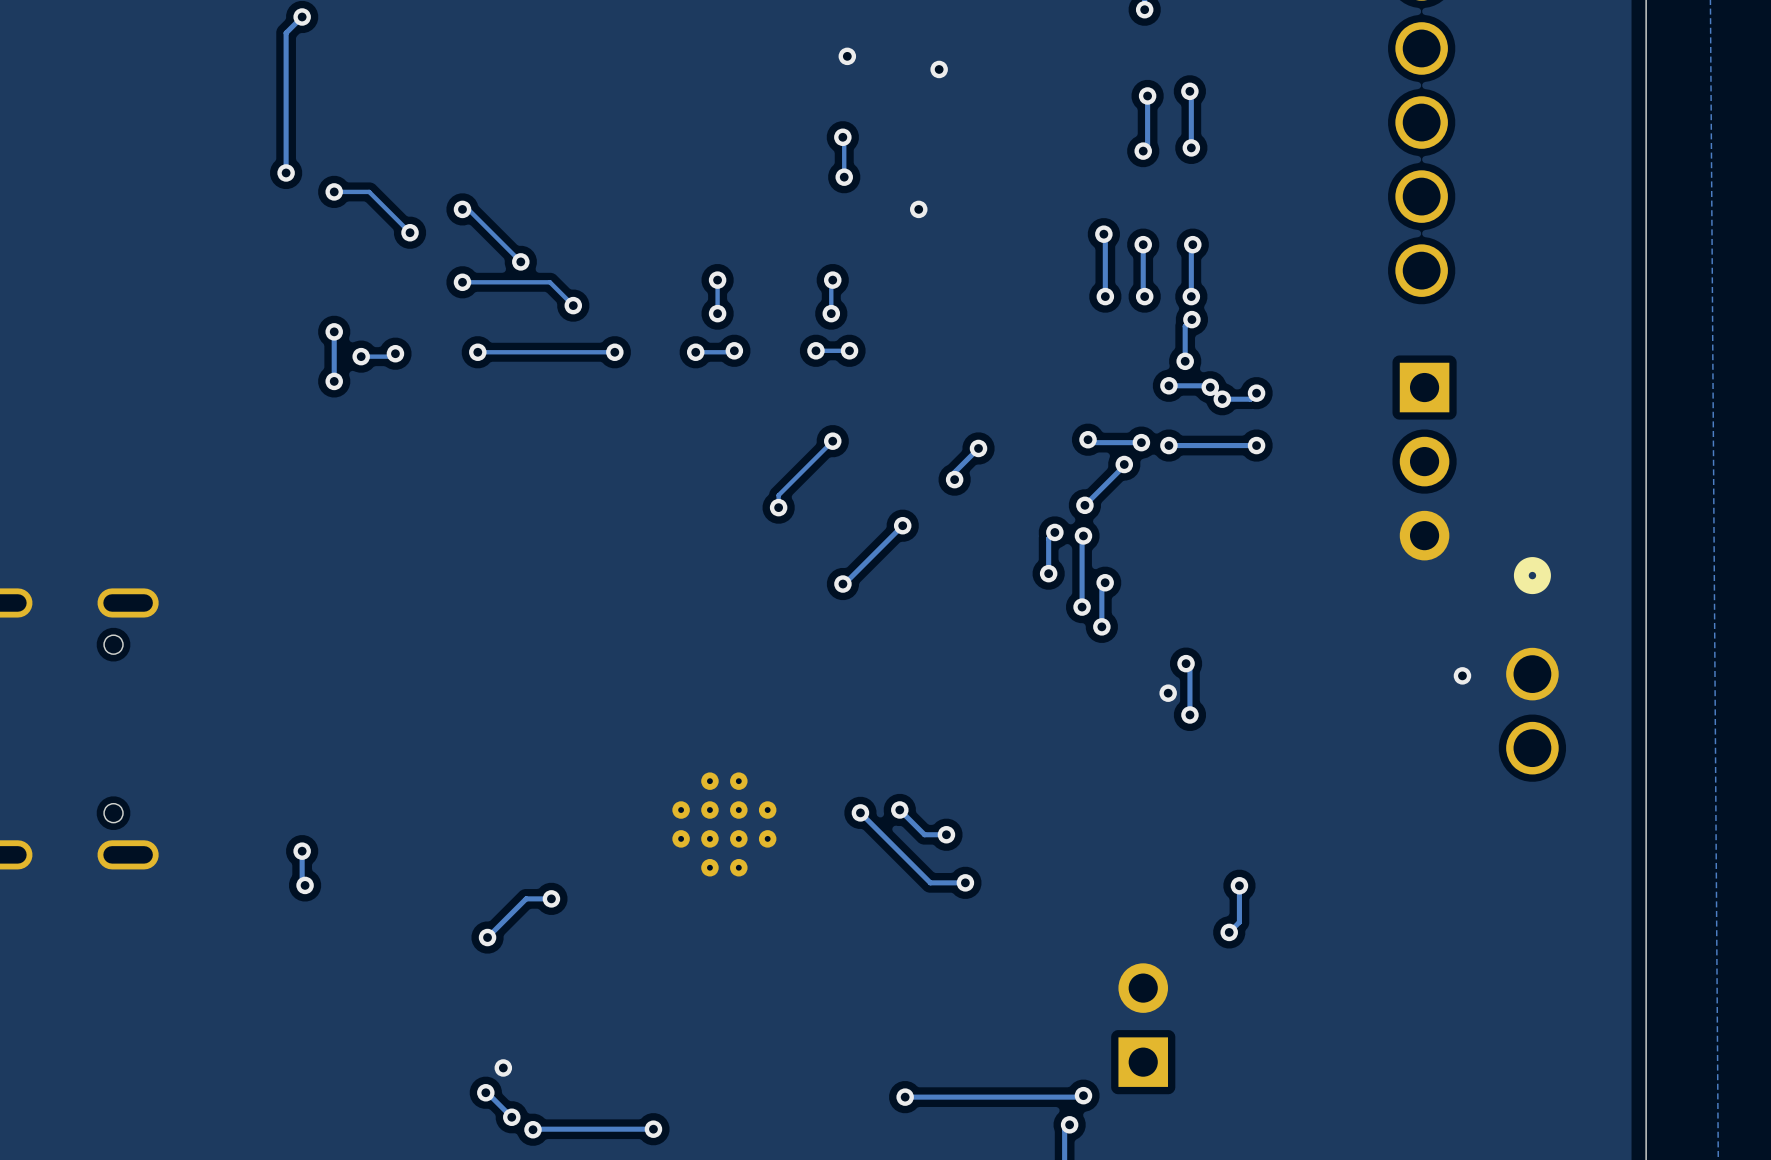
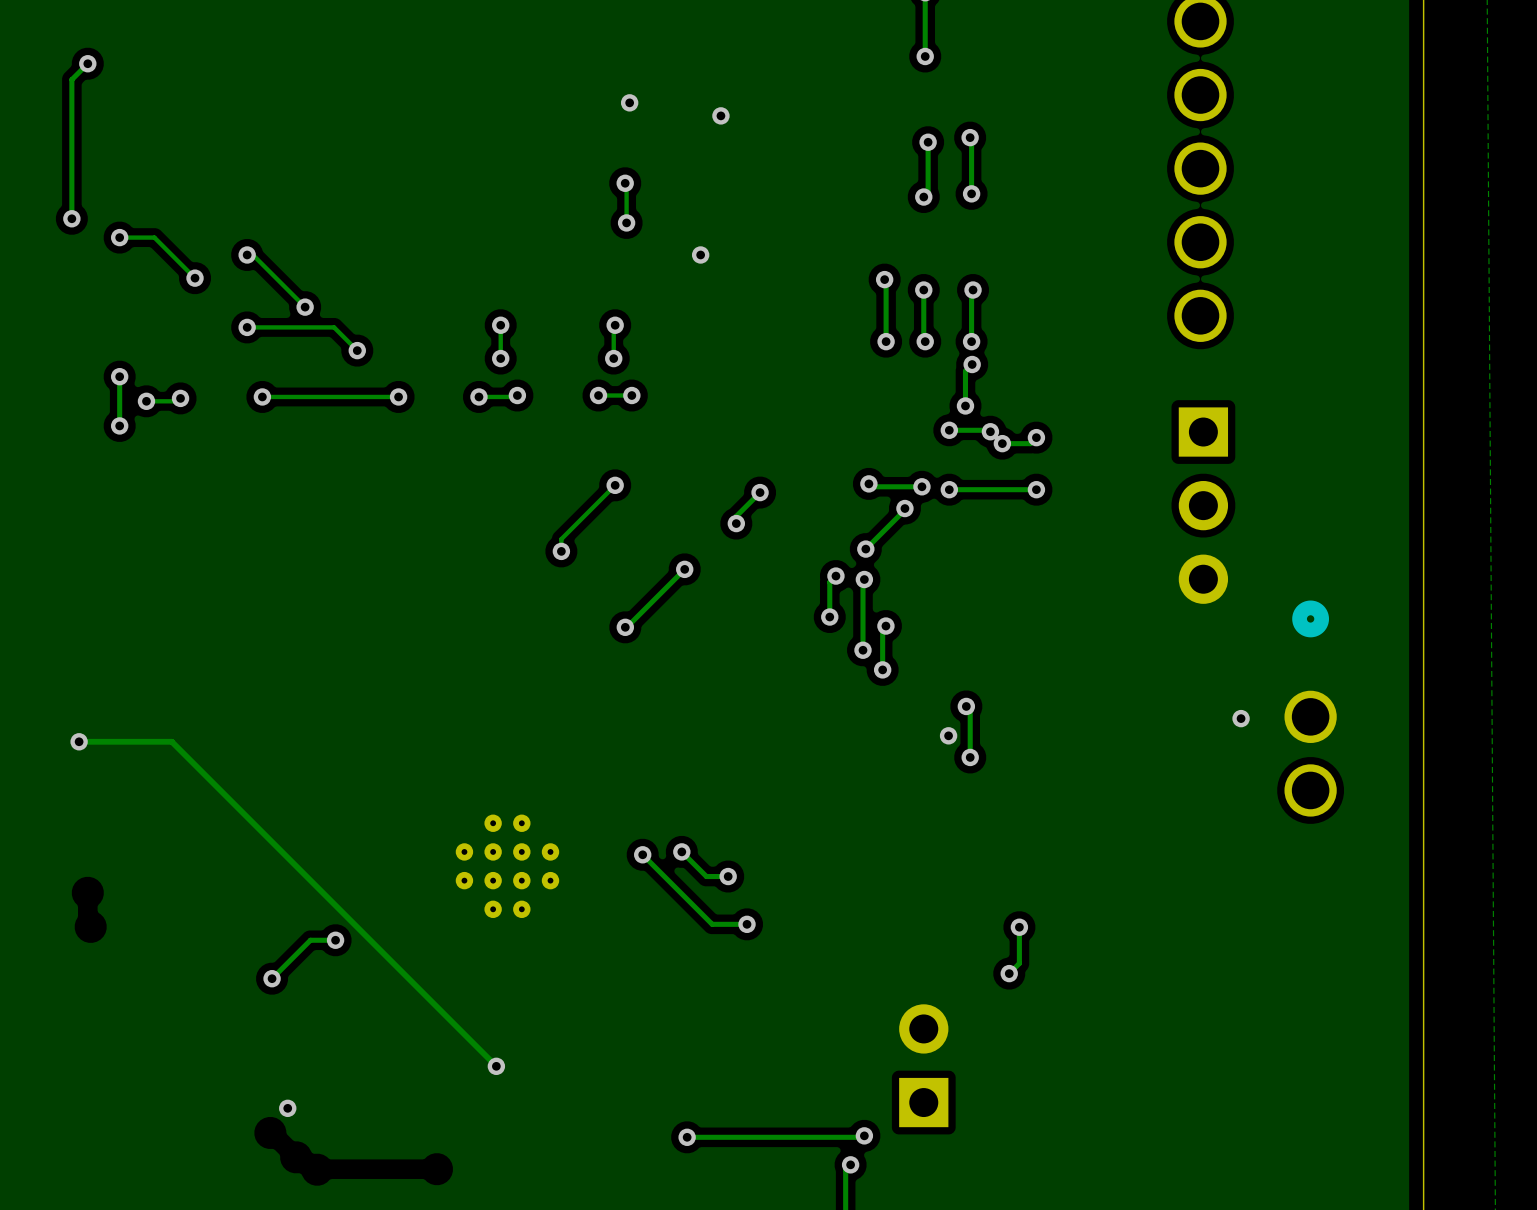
track: none -> (79, 741) (171, 741) (496, 1066)
via: none -> (79, 741)
track: (302, 851) (302, 882) (305, 885) -> none
via: (302, 851) -> none
via: (305, 885) -> none
via: none -> (496, 1066)
track: (485, 1092) (511, 1117) -> none
via: (485, 1092) -> none
via: (511, 1117) -> none
via: (533, 1129) -> none
track: (653, 1129) (533, 1129) -> none
via: (653, 1129) -> none

